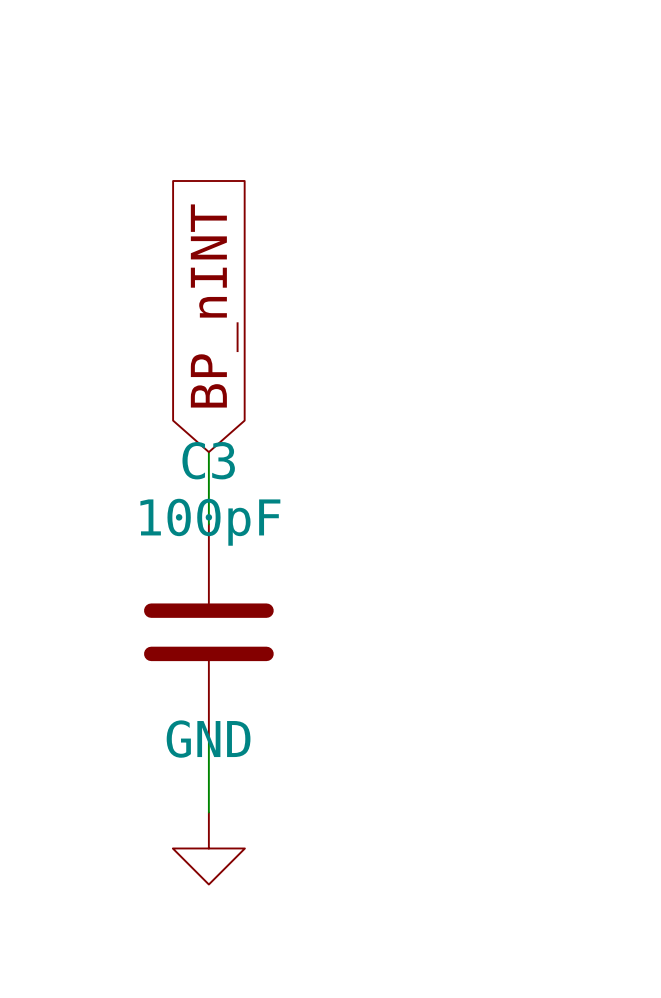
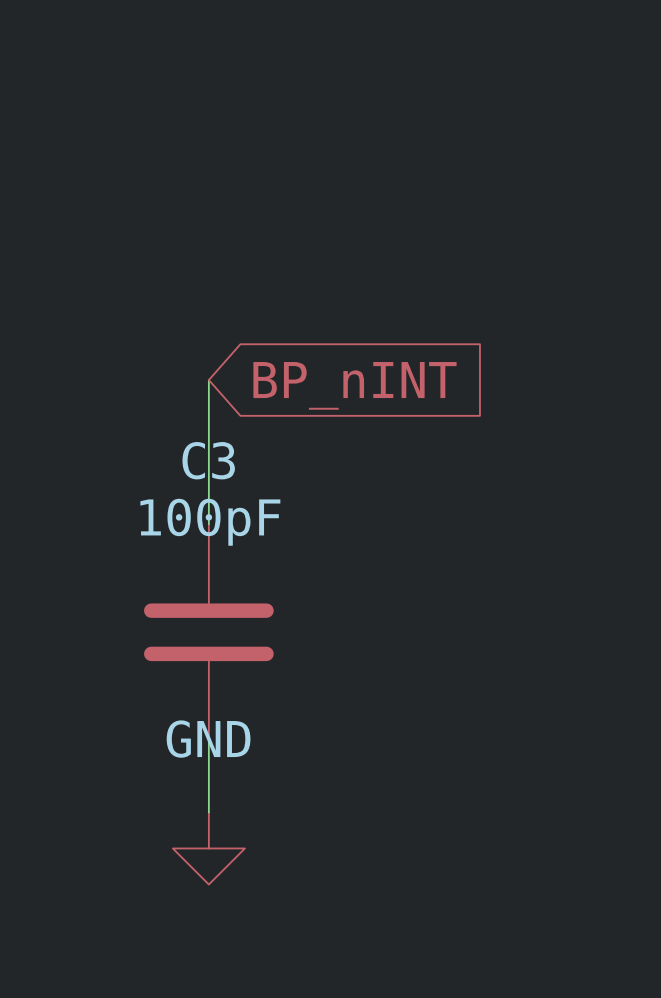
global label rotation: 0° (214, 305) -> 90° clockwise (355, 385)
wire: none -> (208, 380) (208, 452)

